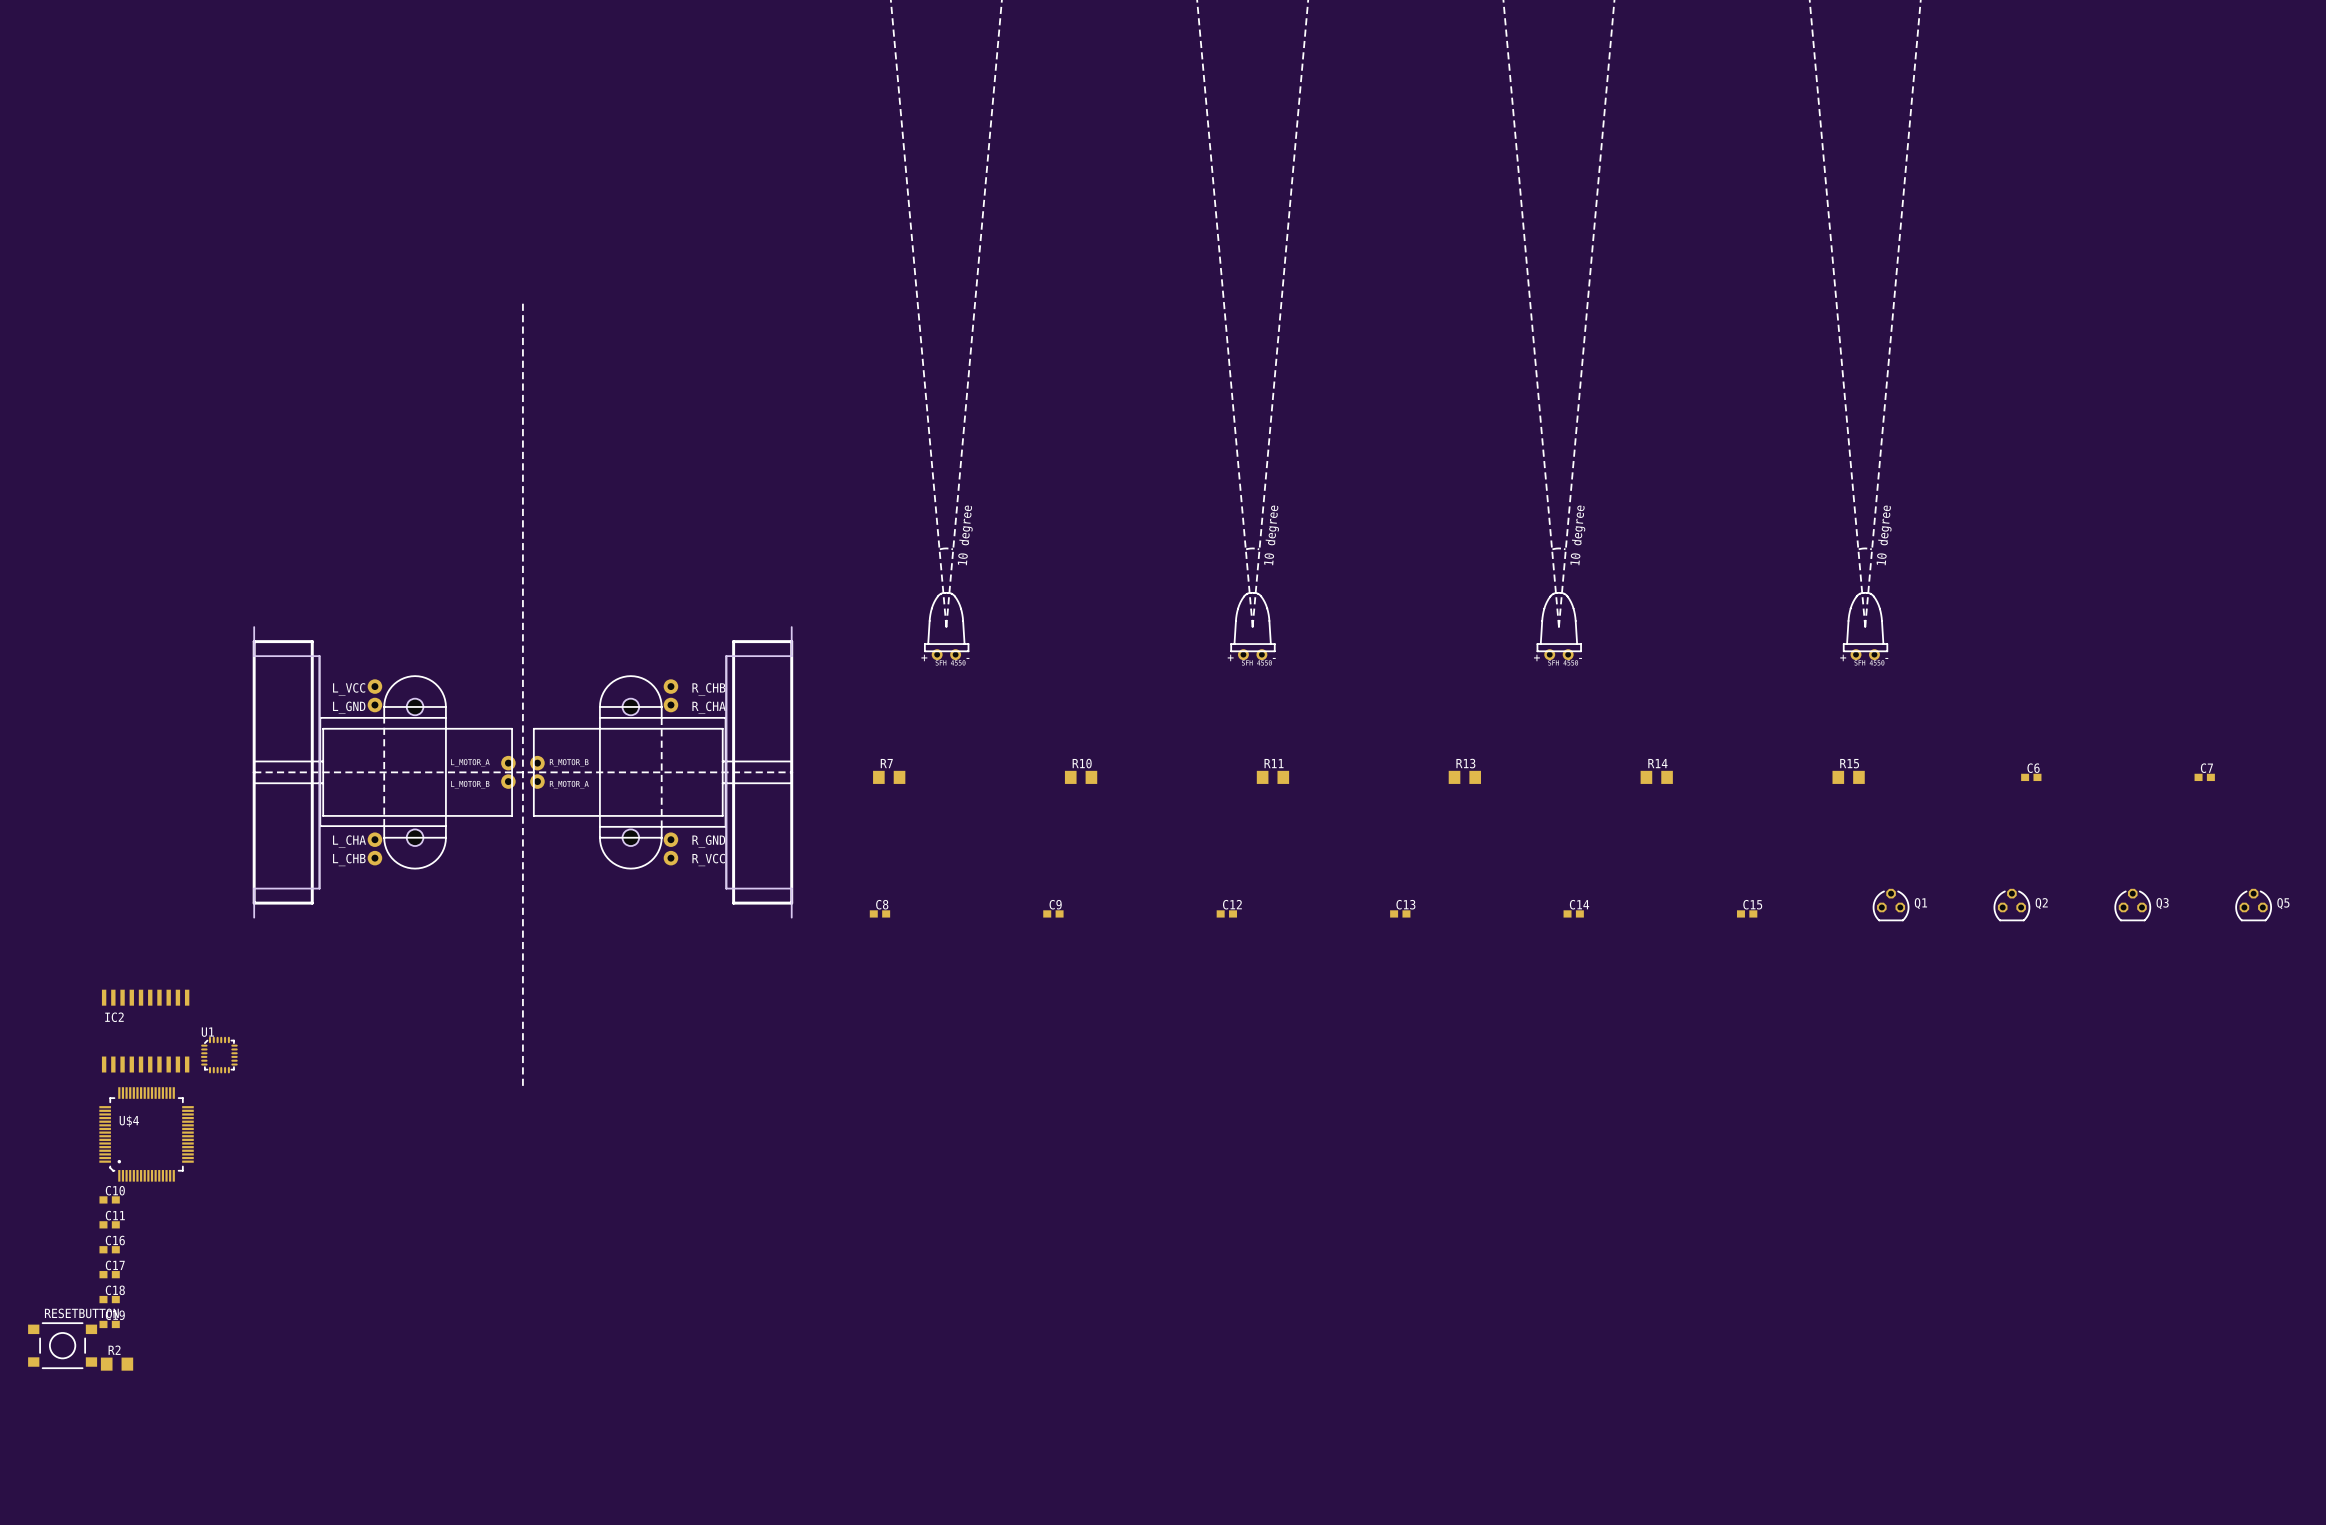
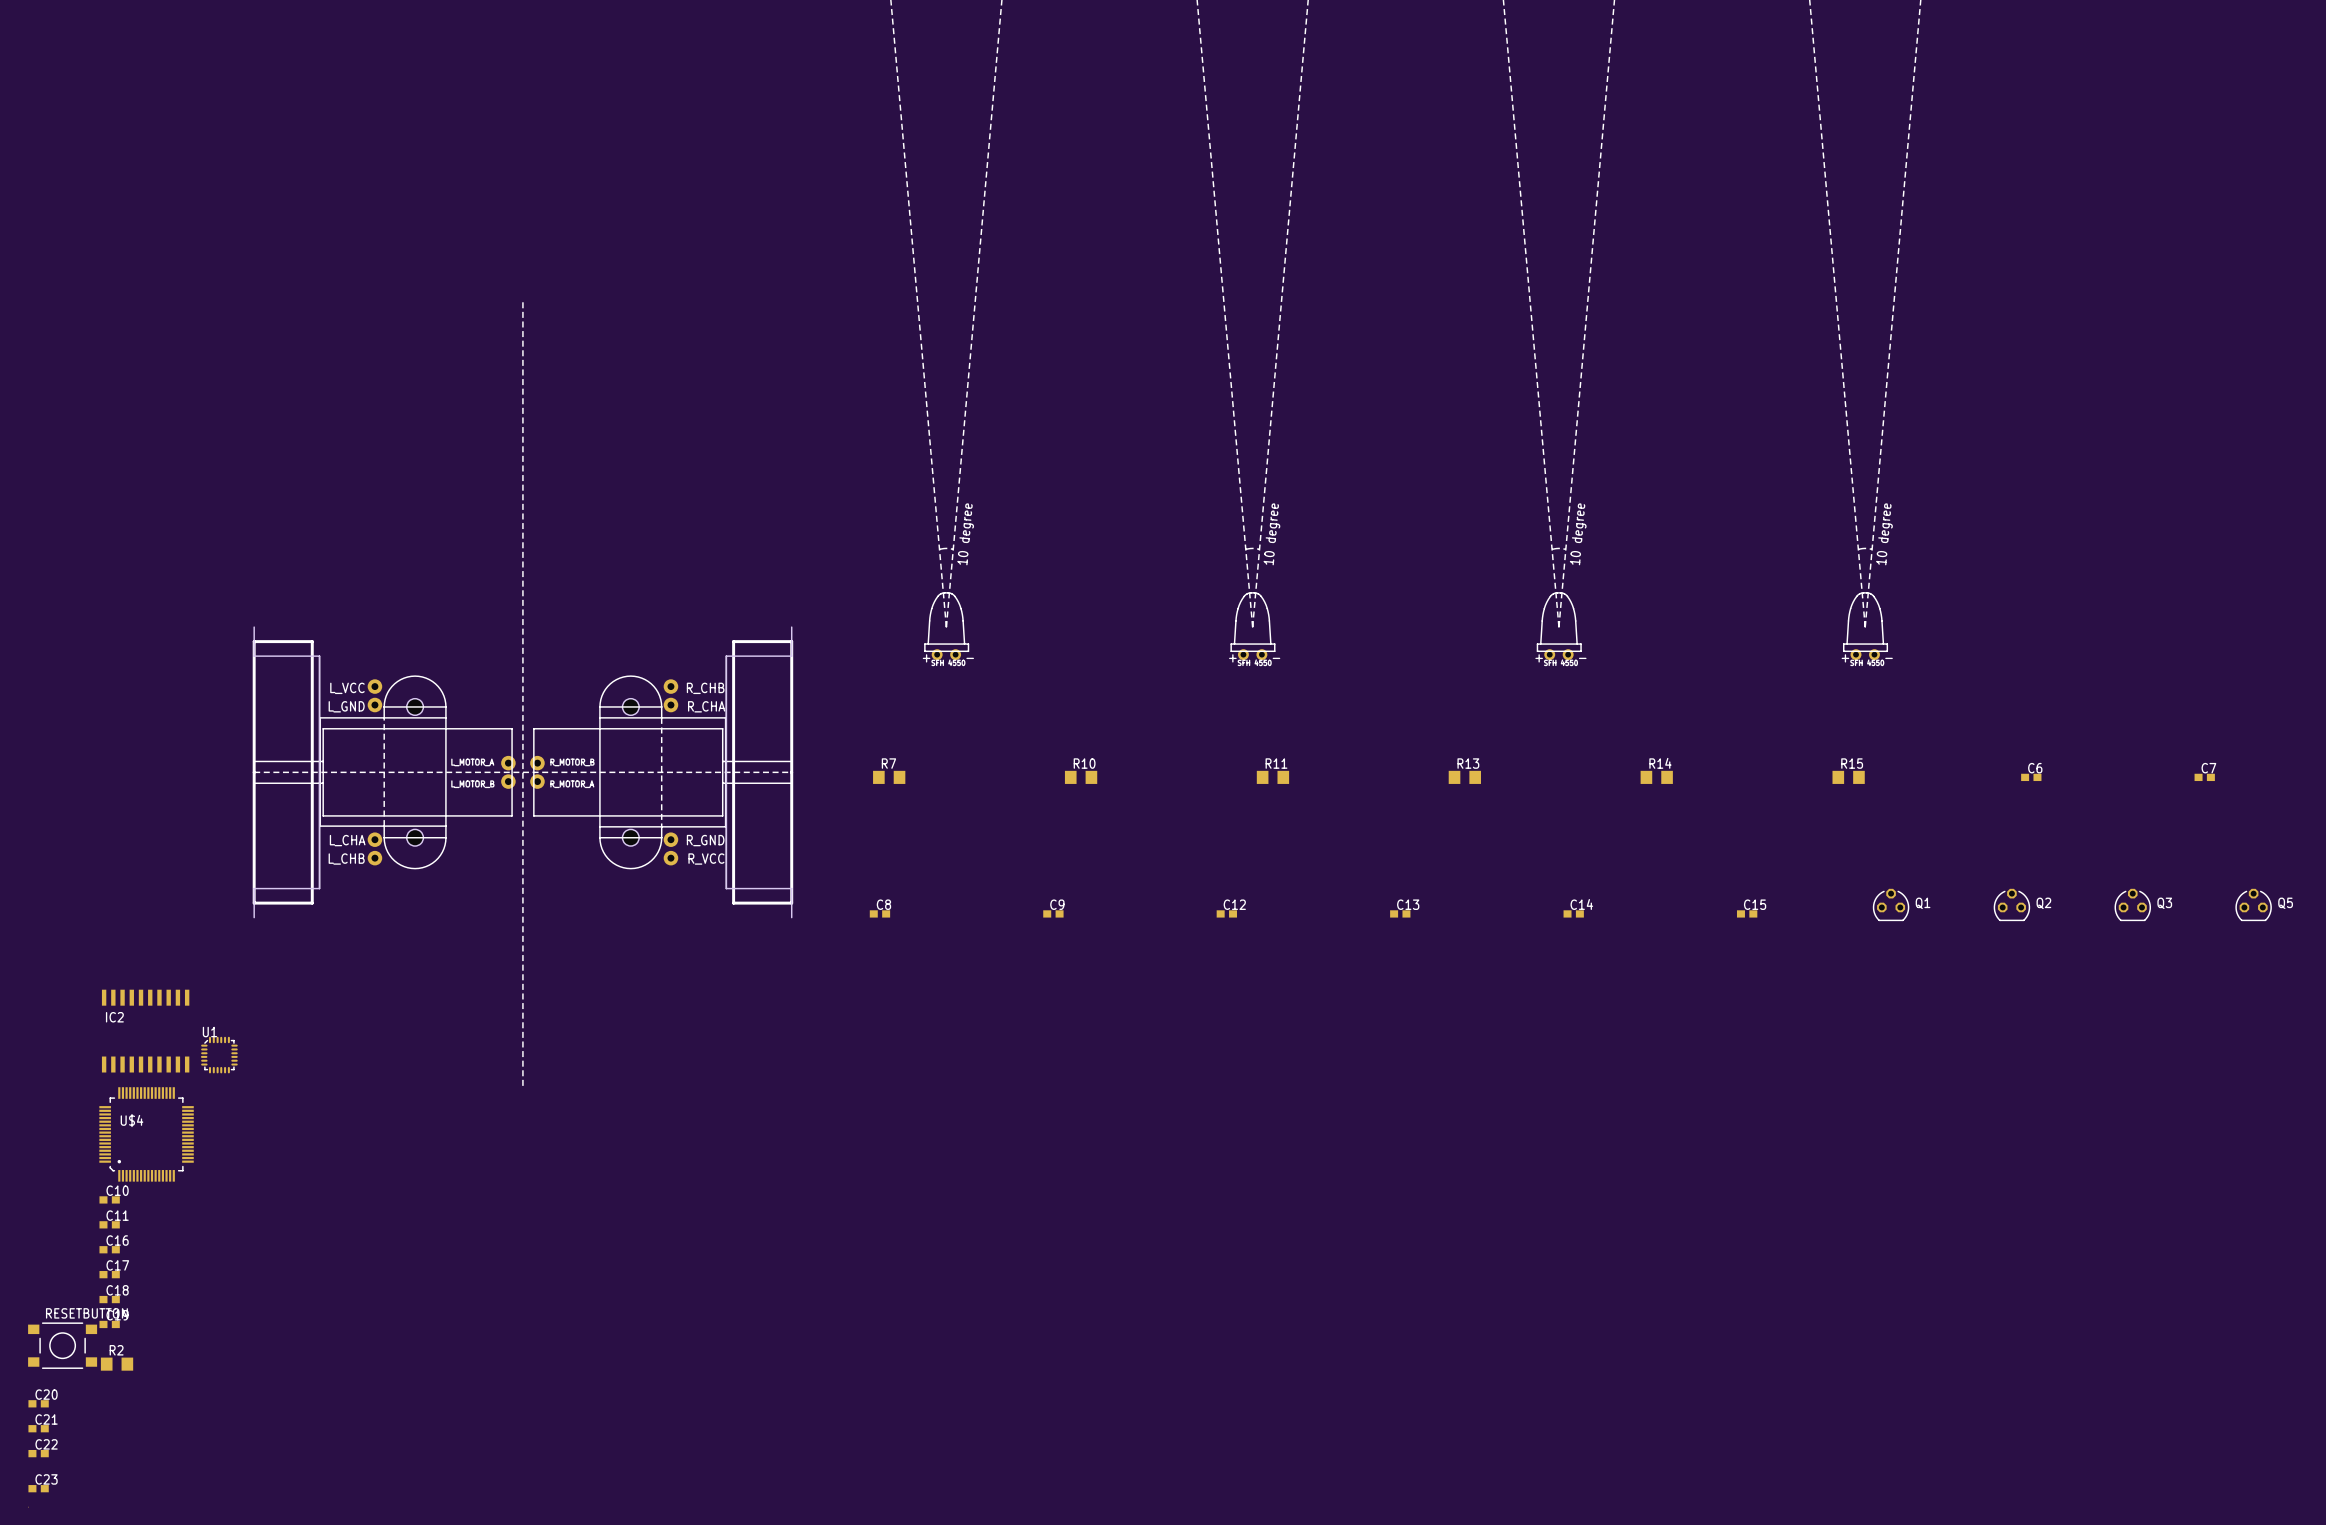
C20: none -> (38, 1403)
C21: none -> (38, 1428)
C22: none -> (38, 1453)
C23: none -> (38, 1488)

